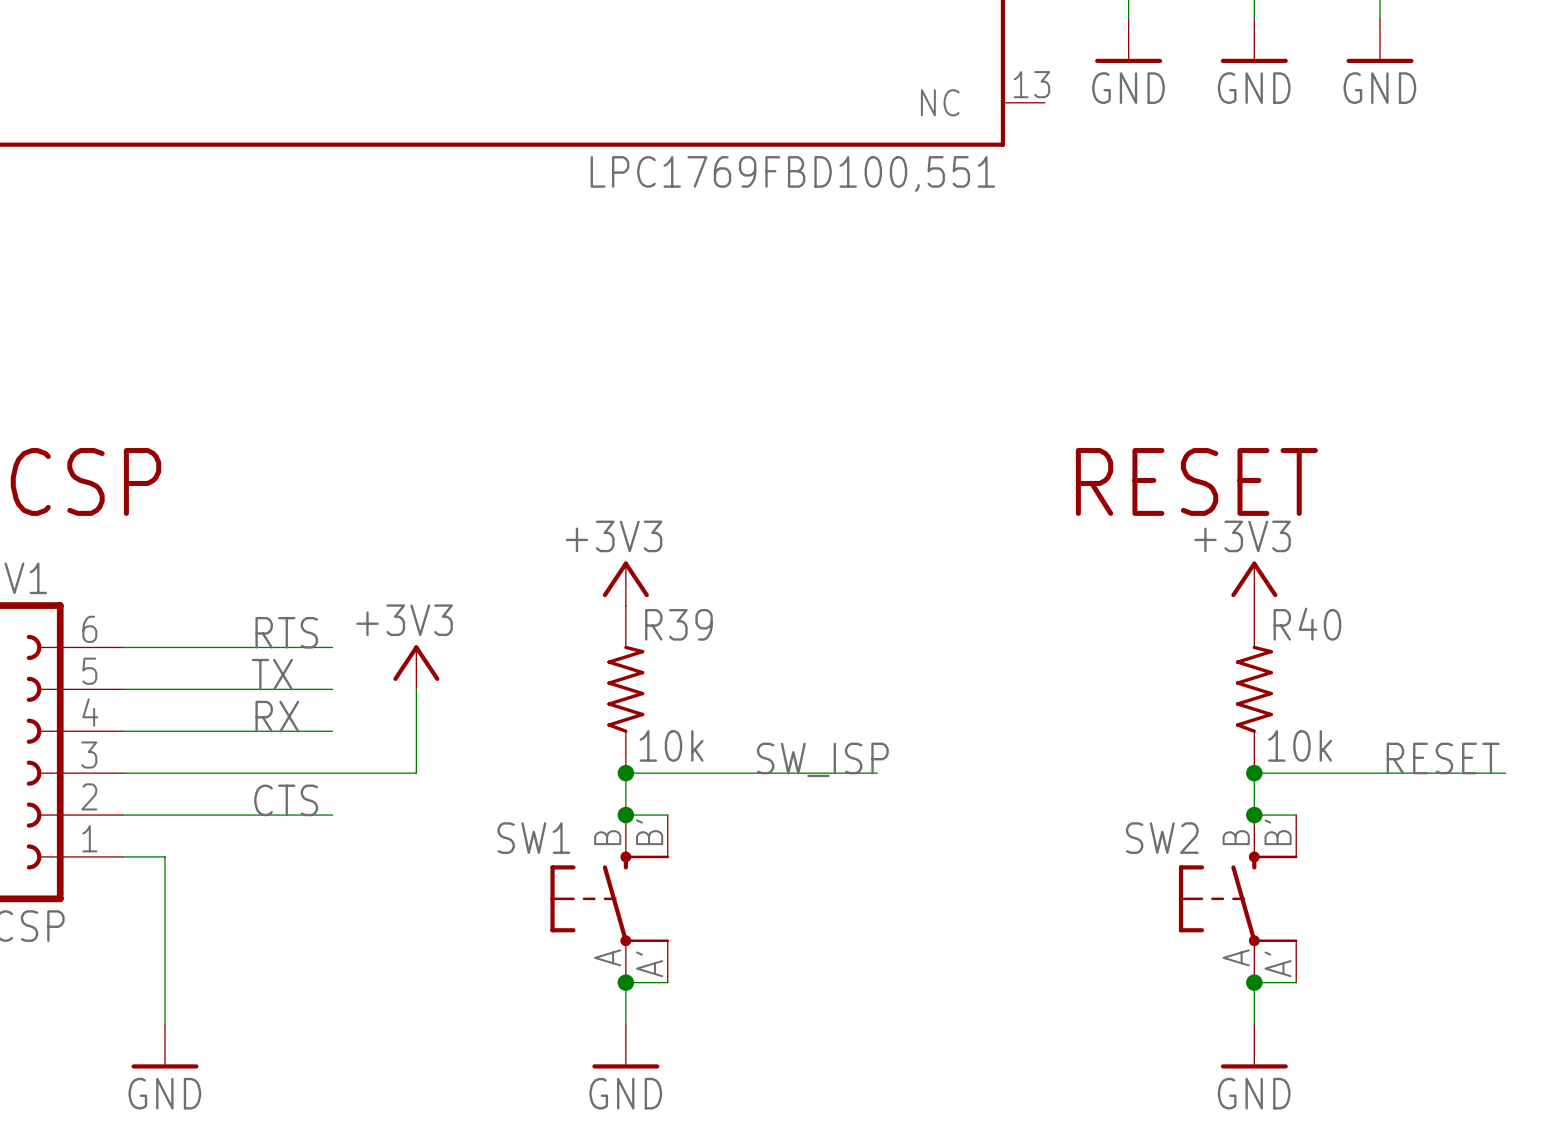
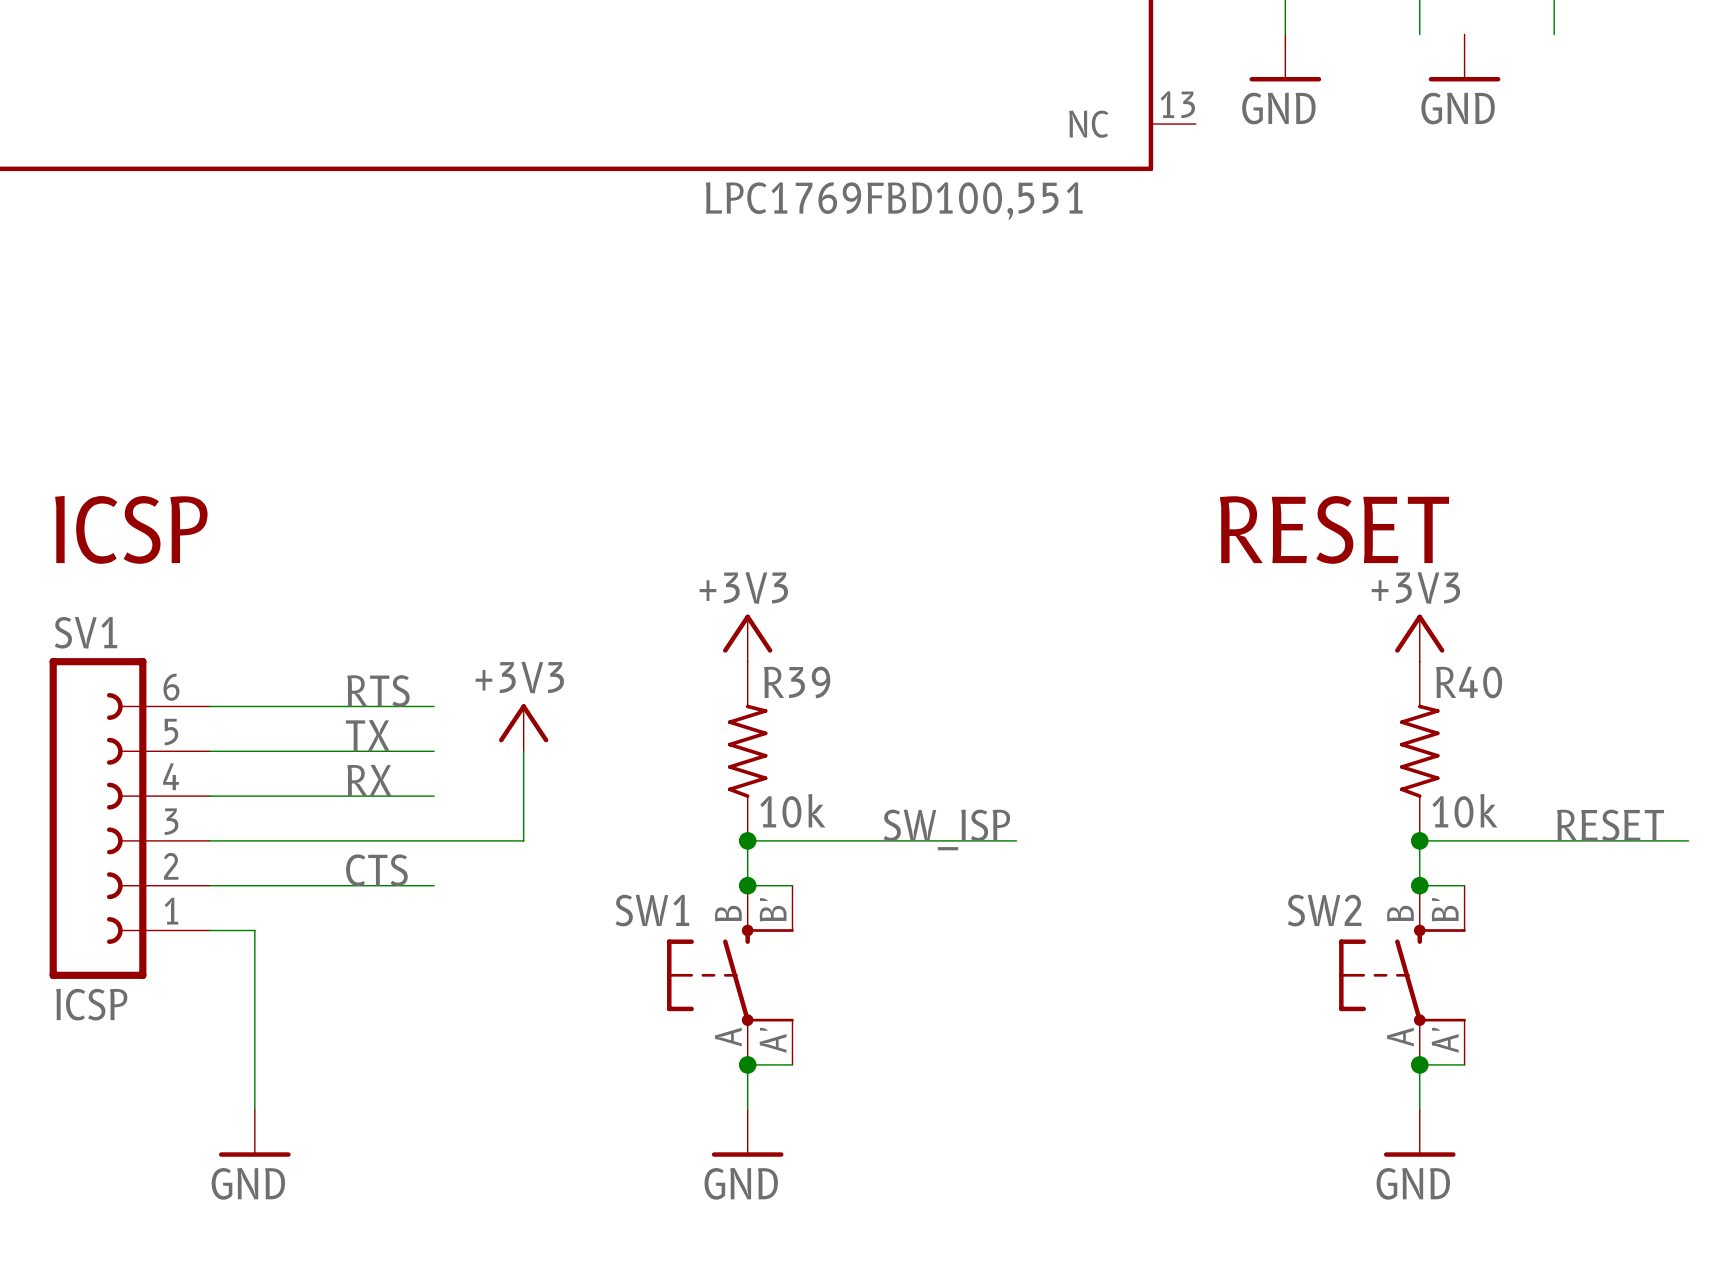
power symbol: GND (1254, 40) -> none
power symbol: none -> GND (1464, 57)
power symbol: GND (1380, 40) -> none

